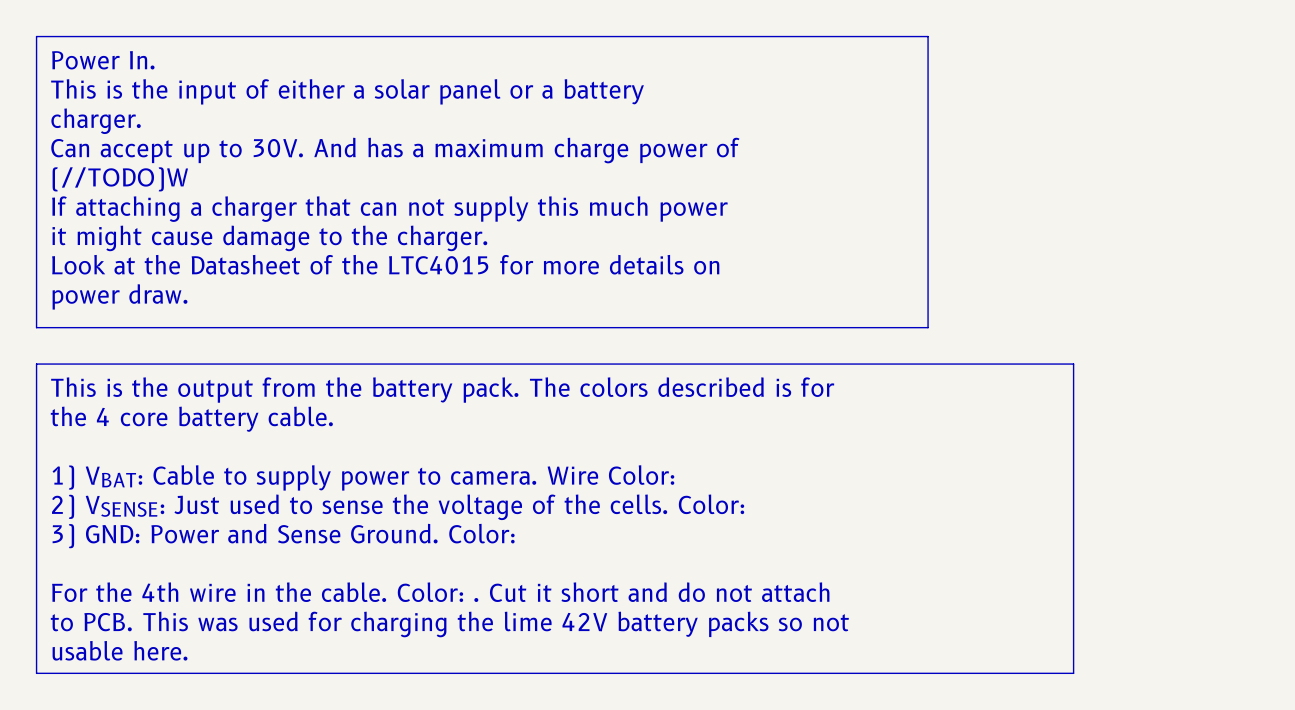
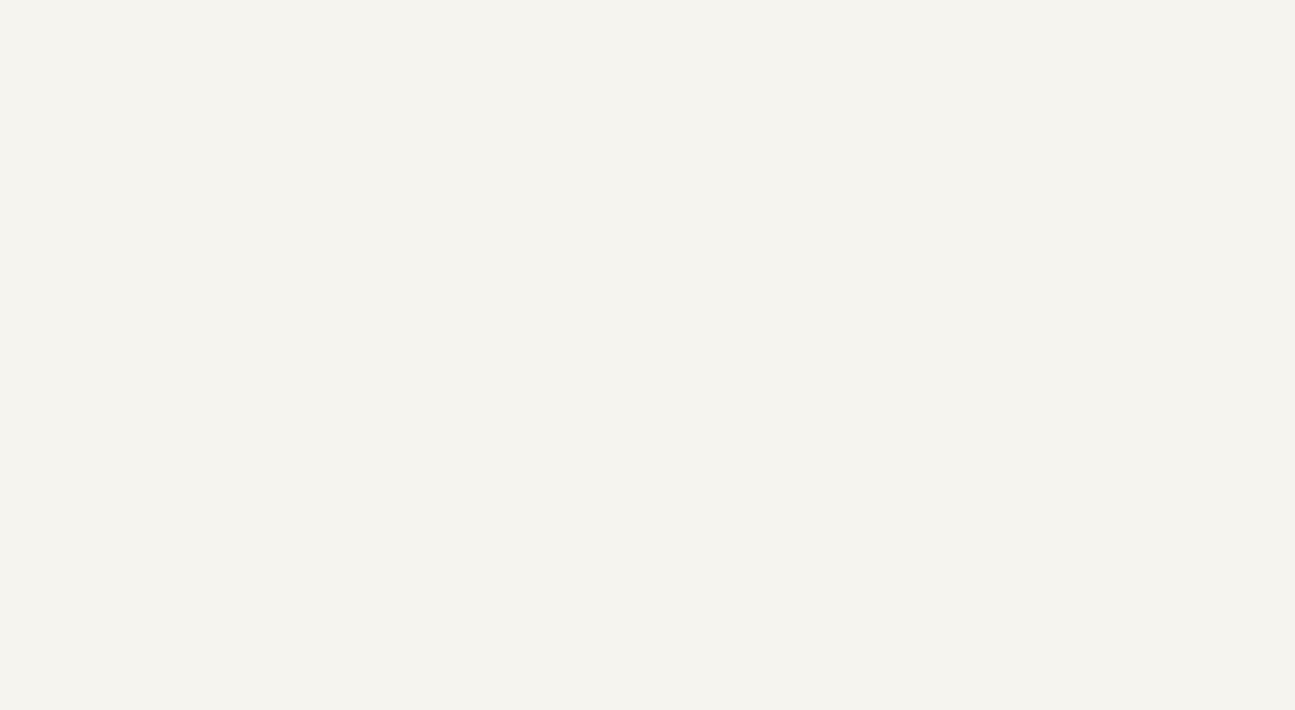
line: (36, 36) (36, 327) (928, 327) (928, 36) (36, 36) -> none
text: Power In. (103, 60) -> none
text: This is the input of either a solar panel or a battery (347, 91) -> none
text: charger. (96, 121) -> none
text: Can accept up to 30V. And has a maximum charge power of (395, 150) -> none
text: (//TODO)W (120, 179) -> none
text: If attaching a charger that can not supply this much power (389, 209) -> none
text: it might cause damage to the charger. (269, 238) -> none
text: Look at the Datasheet of the LTC4015 for more details on (385, 264) -> none
text: power draw. (120, 296) -> none
line: (36, 364) (1073, 364) (1073, 673) (36, 673) (36, 364) -> none
text: This is the output from the battery pack. The colors described is for (442, 390) -> none
text: the 4 core battery cable. (191, 419) -> none
text: 1) VBAT: Cable to supply power to camera. Wire Color: (363, 477) -> none
text: 2) VSENSE: Just used to sense the voltage of the cells. Color: (398, 507) -> none
text: 3) GND: Power and Sense Ground. Color: (283, 536) -> none
text: For the 4th wire in the cable. Color: . Cut it short and do not attach (440, 592) -> none
text: to PCB. This was used for charging the lime 42V battery packs so not (449, 624) -> none
text: usable here. (120, 650) -> none

